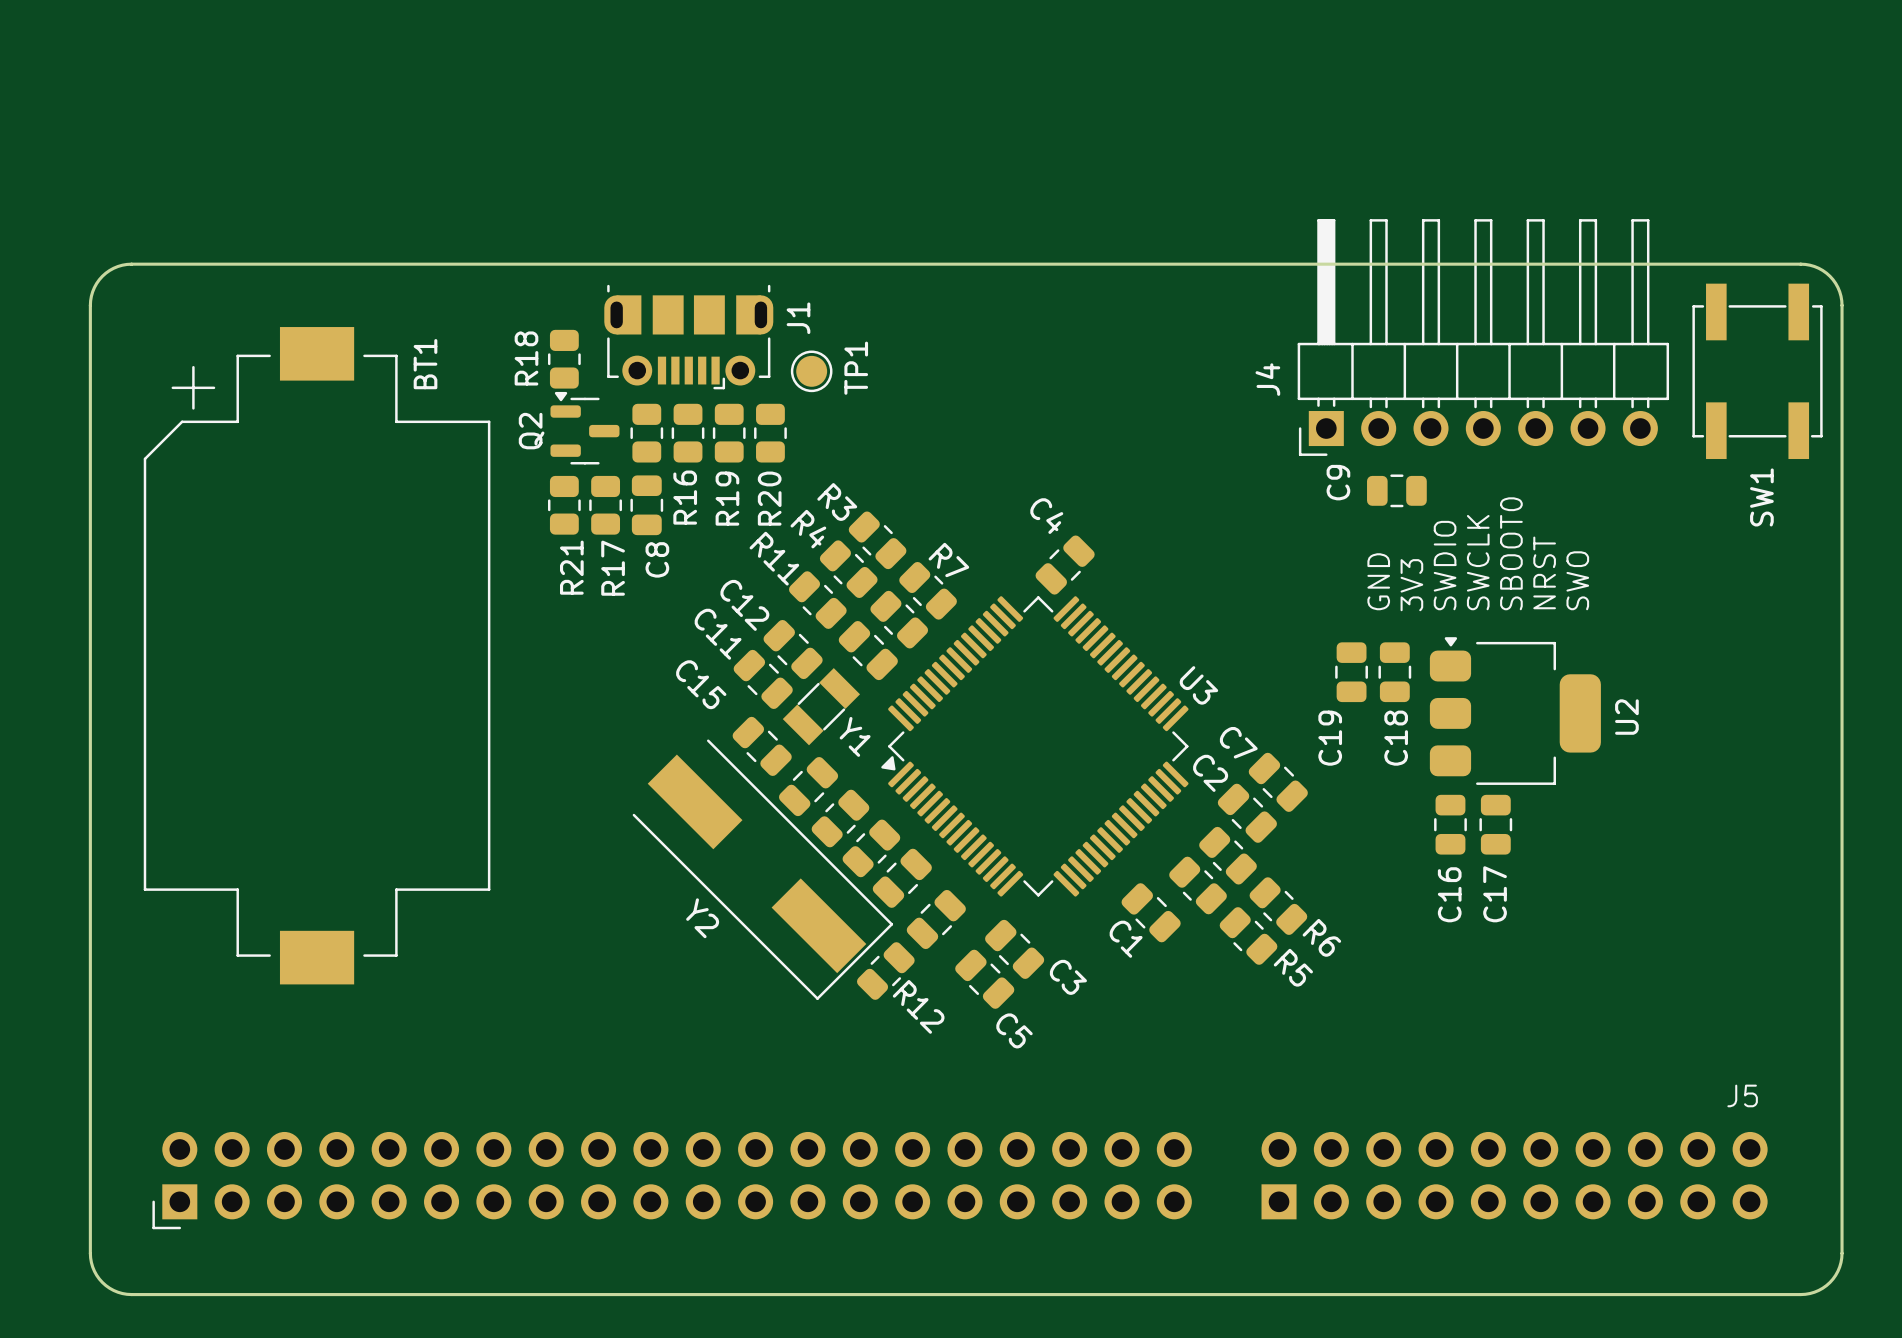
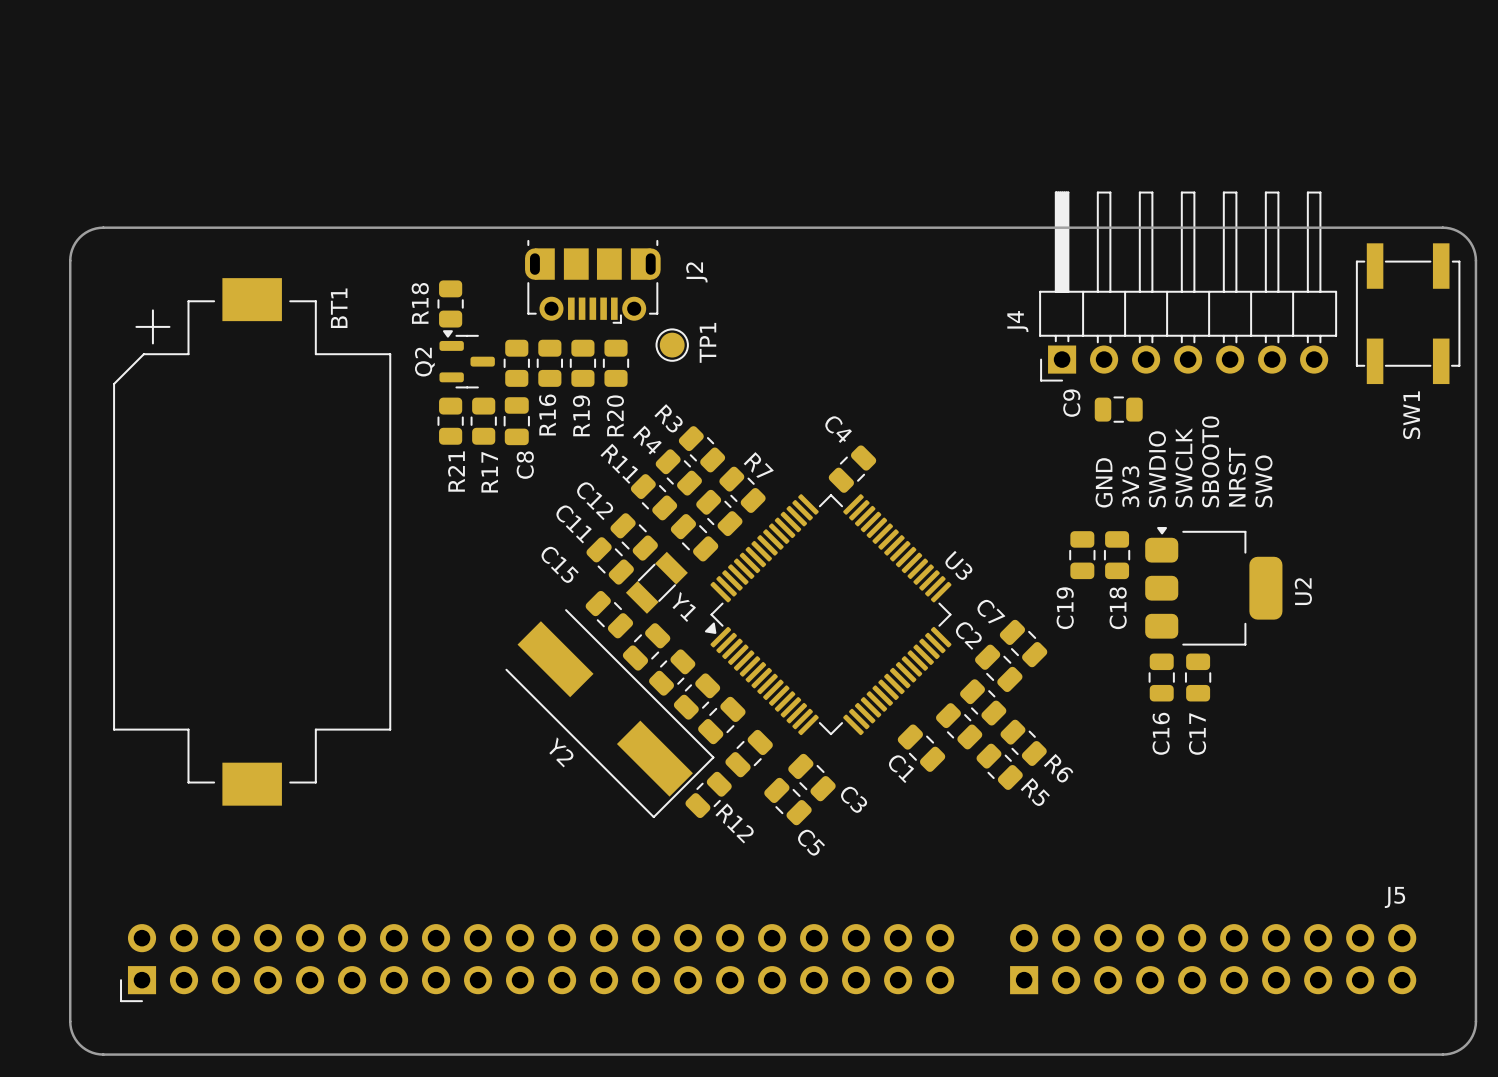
J2: none -> (592, 281)
J1: (688, 337) -> none
TP1 position: (811, 371) -> (672, 345)

